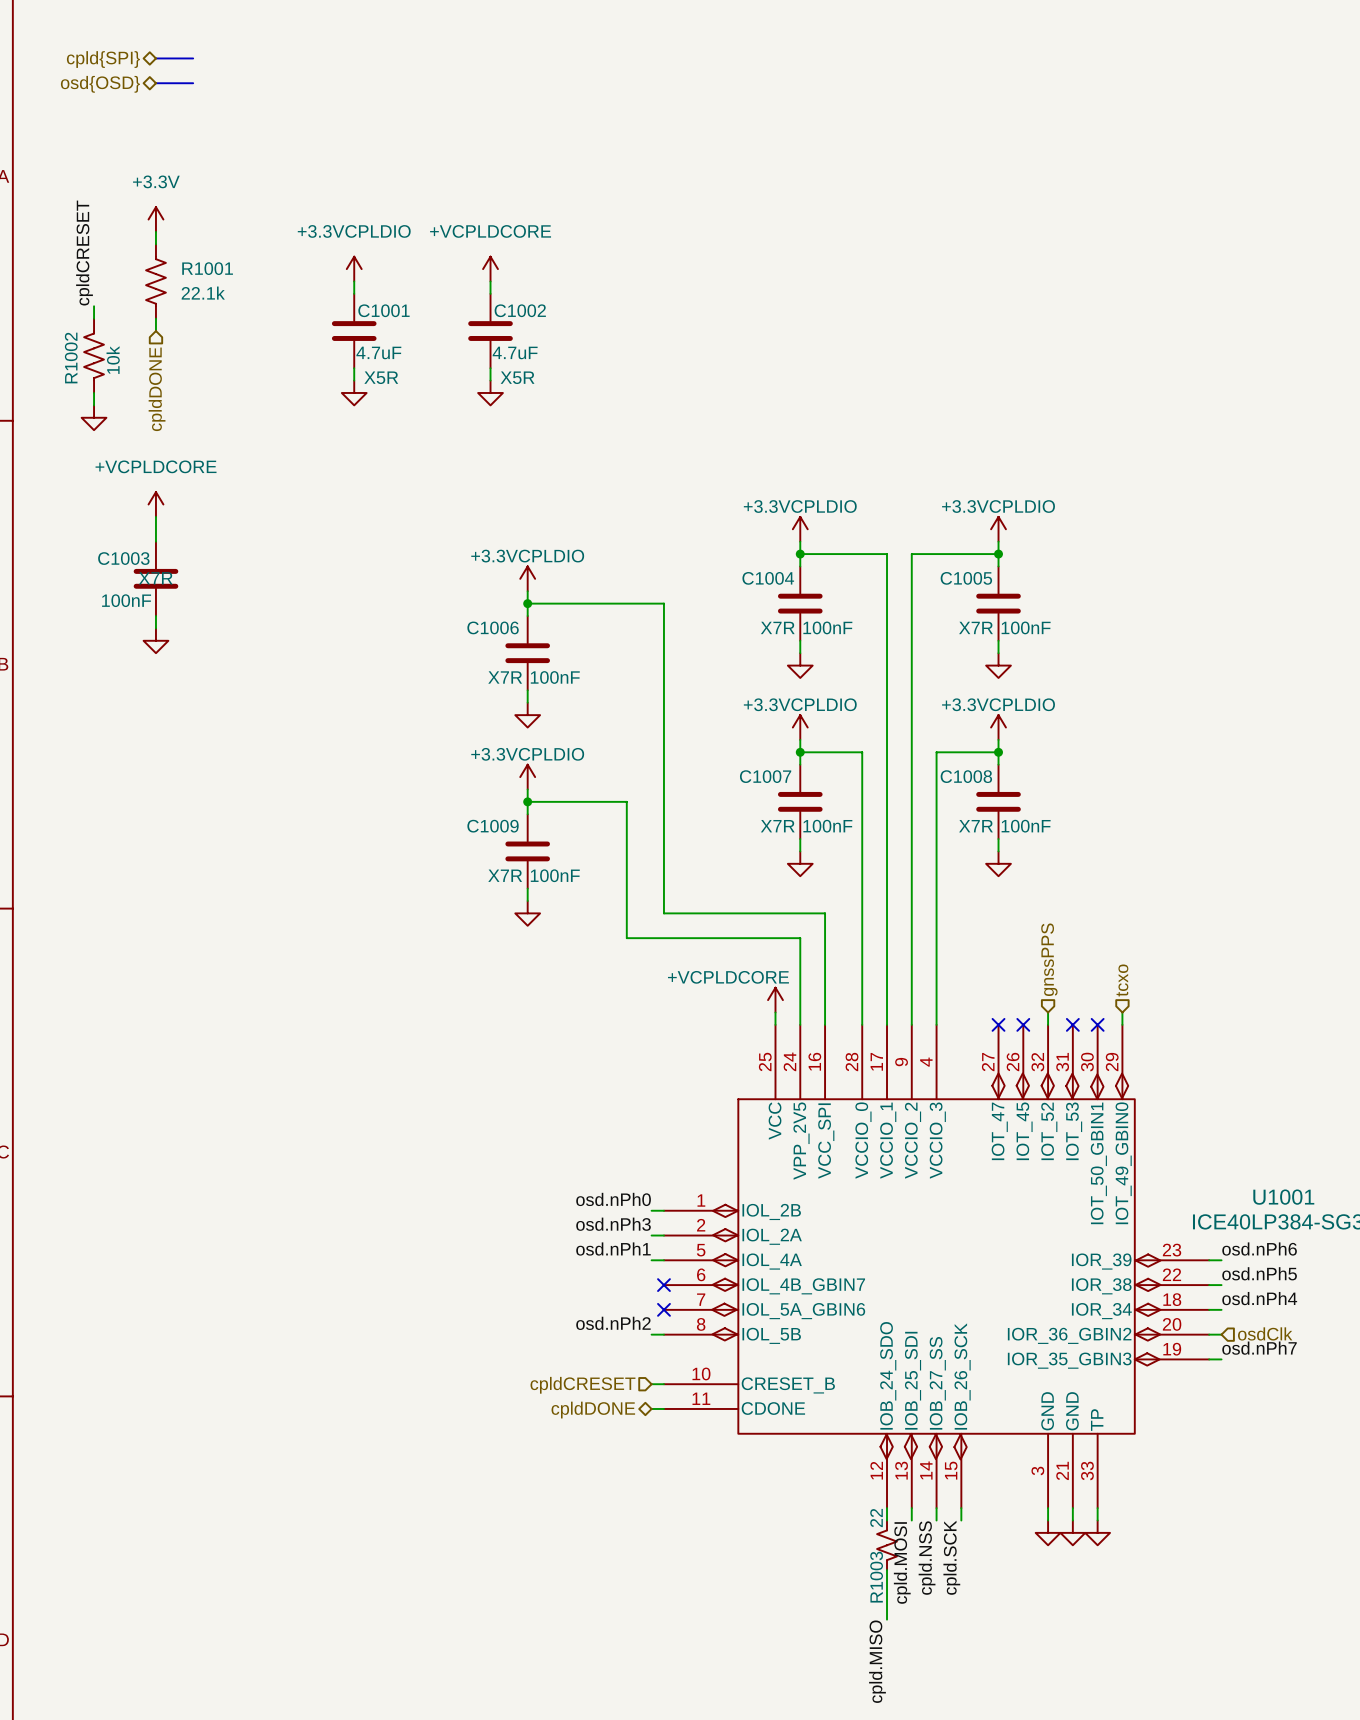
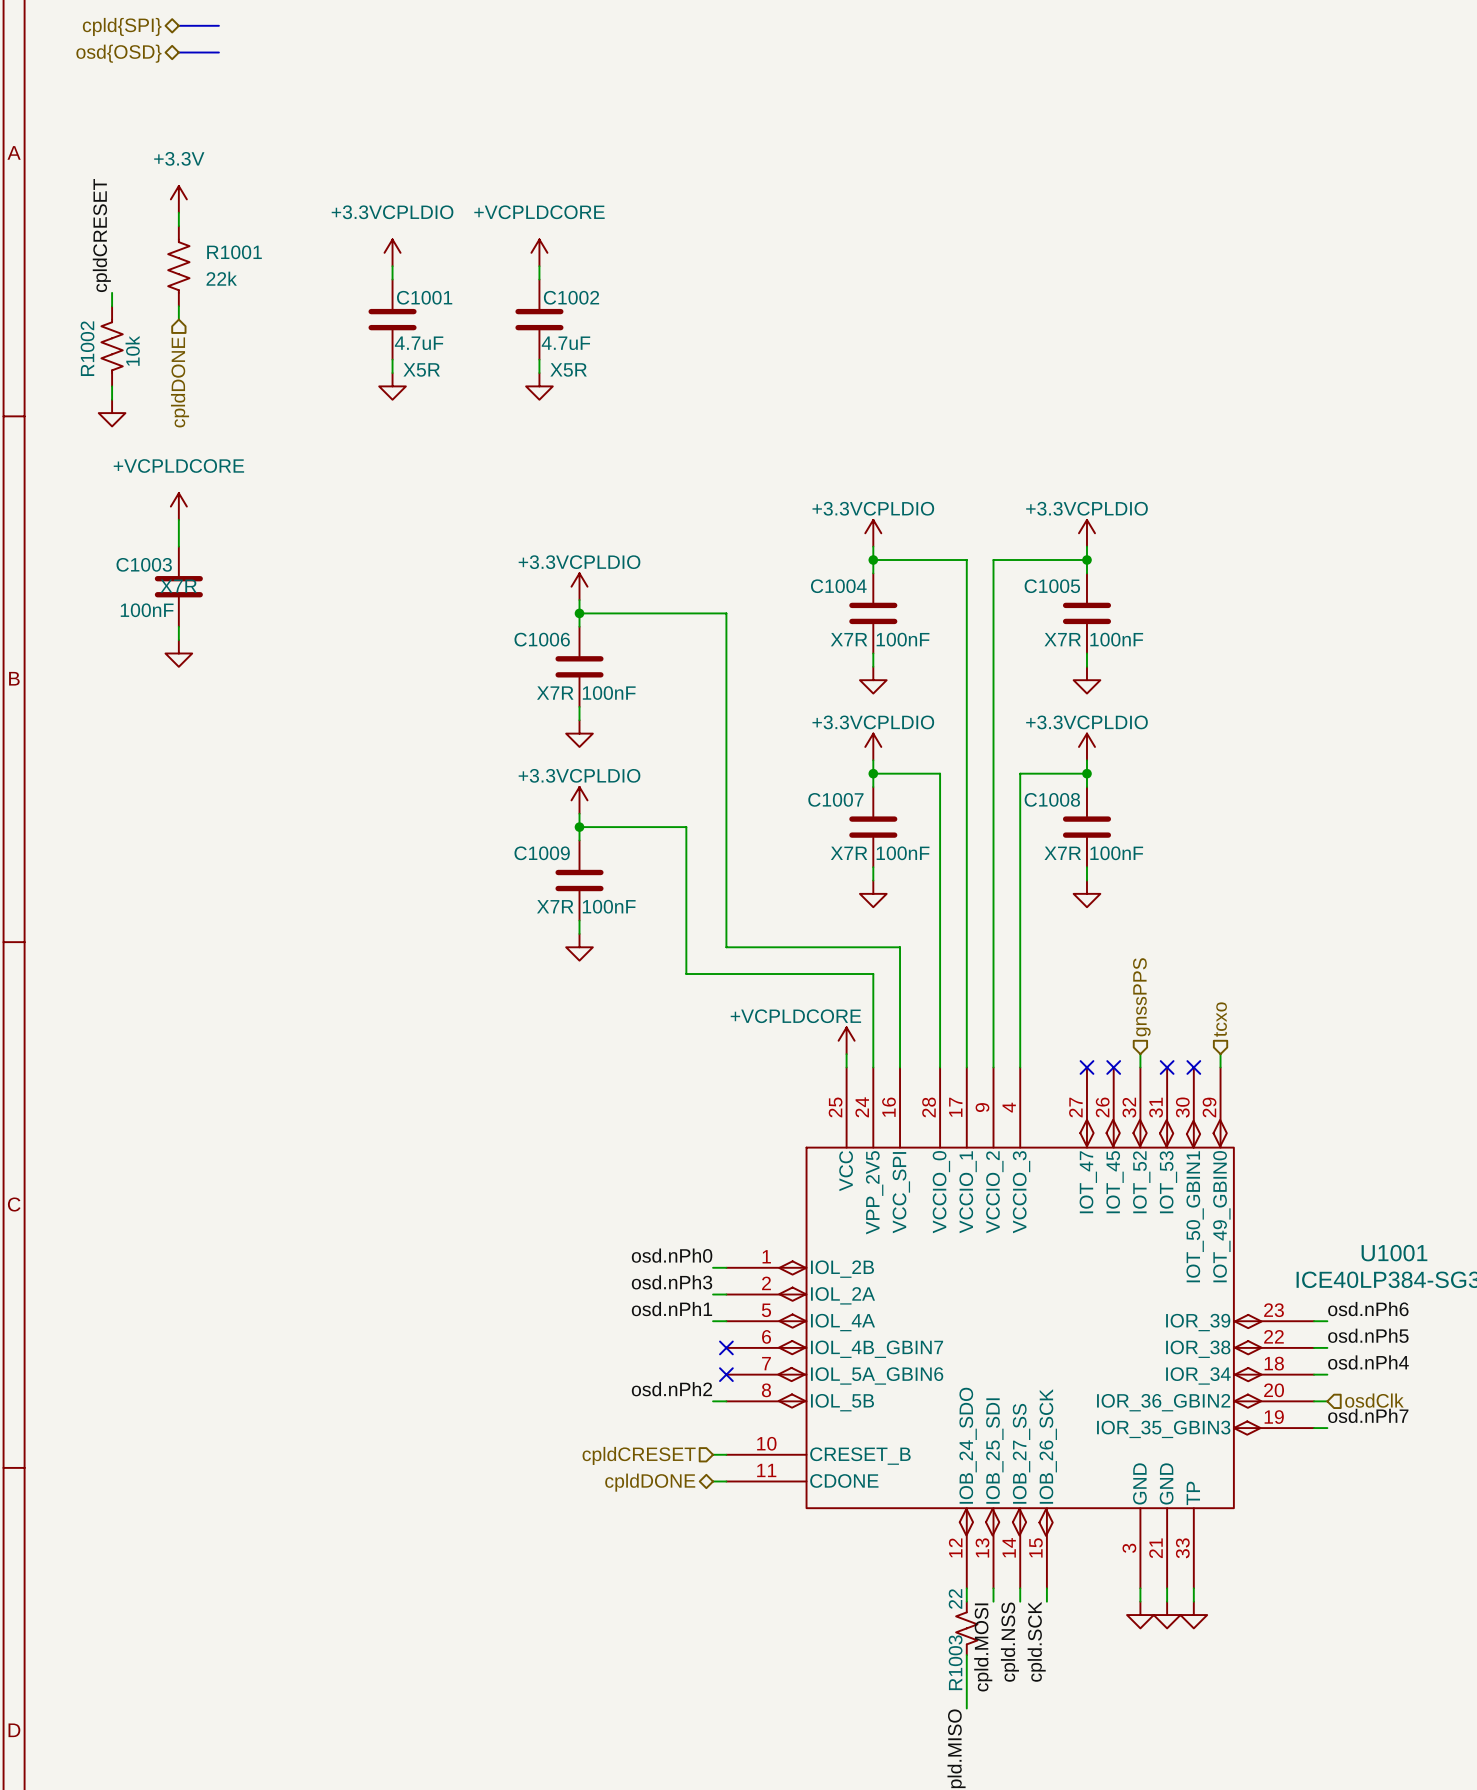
R1001 value: 22.1k (203, 293) -> 22k (221, 278)

